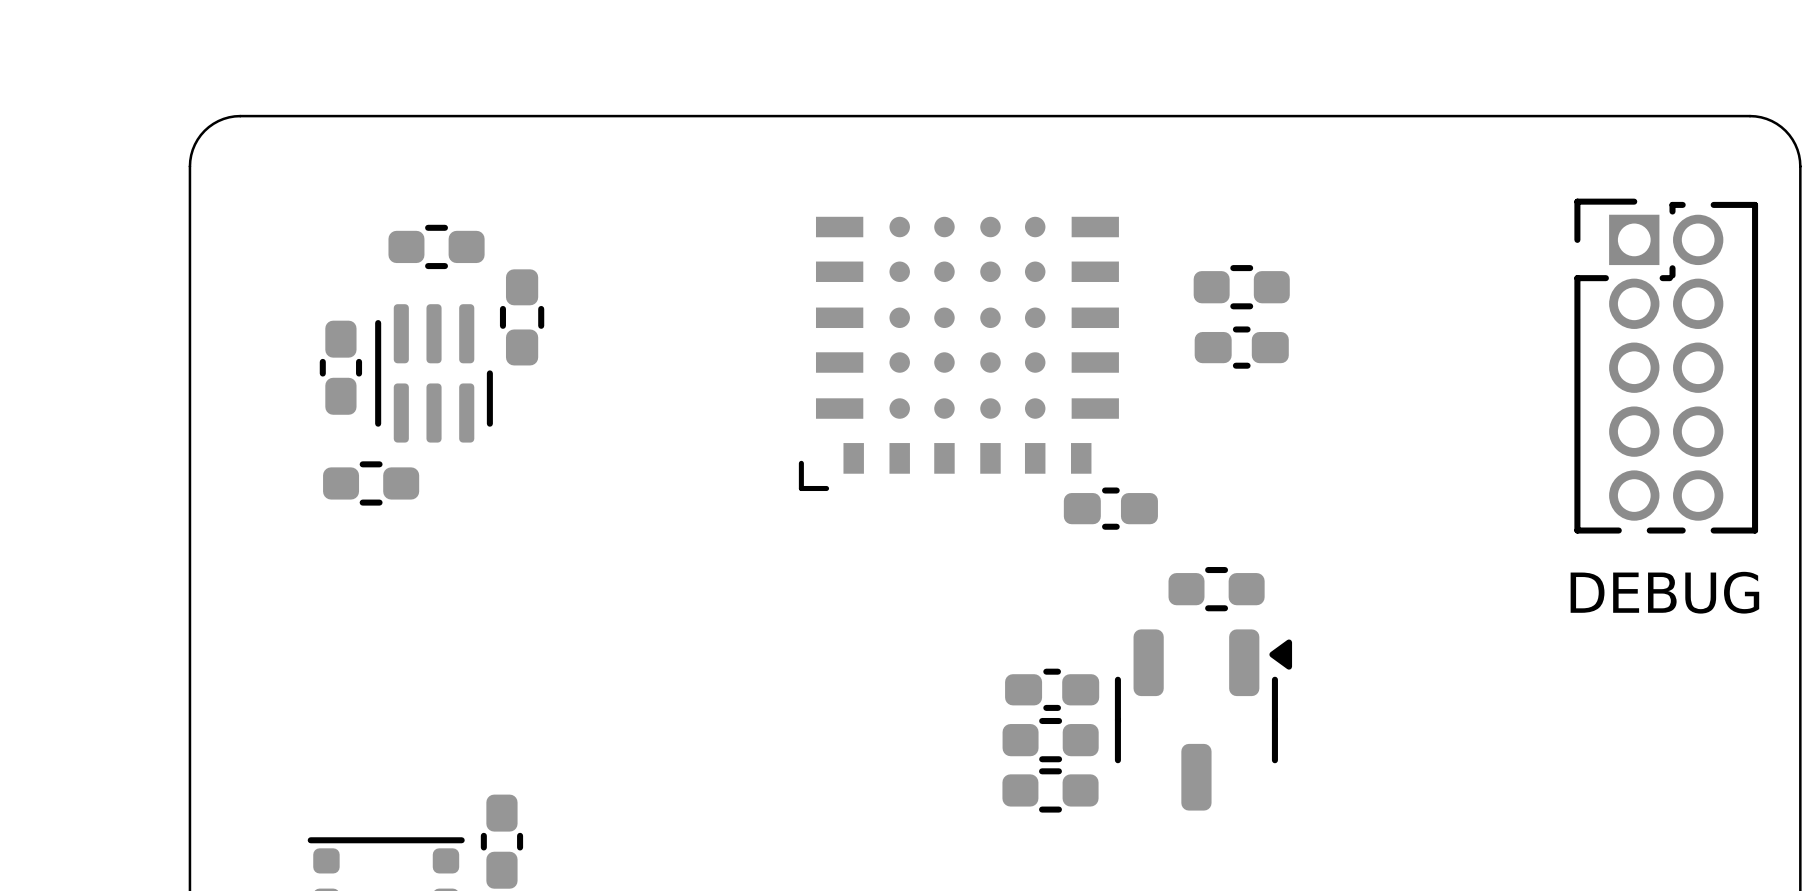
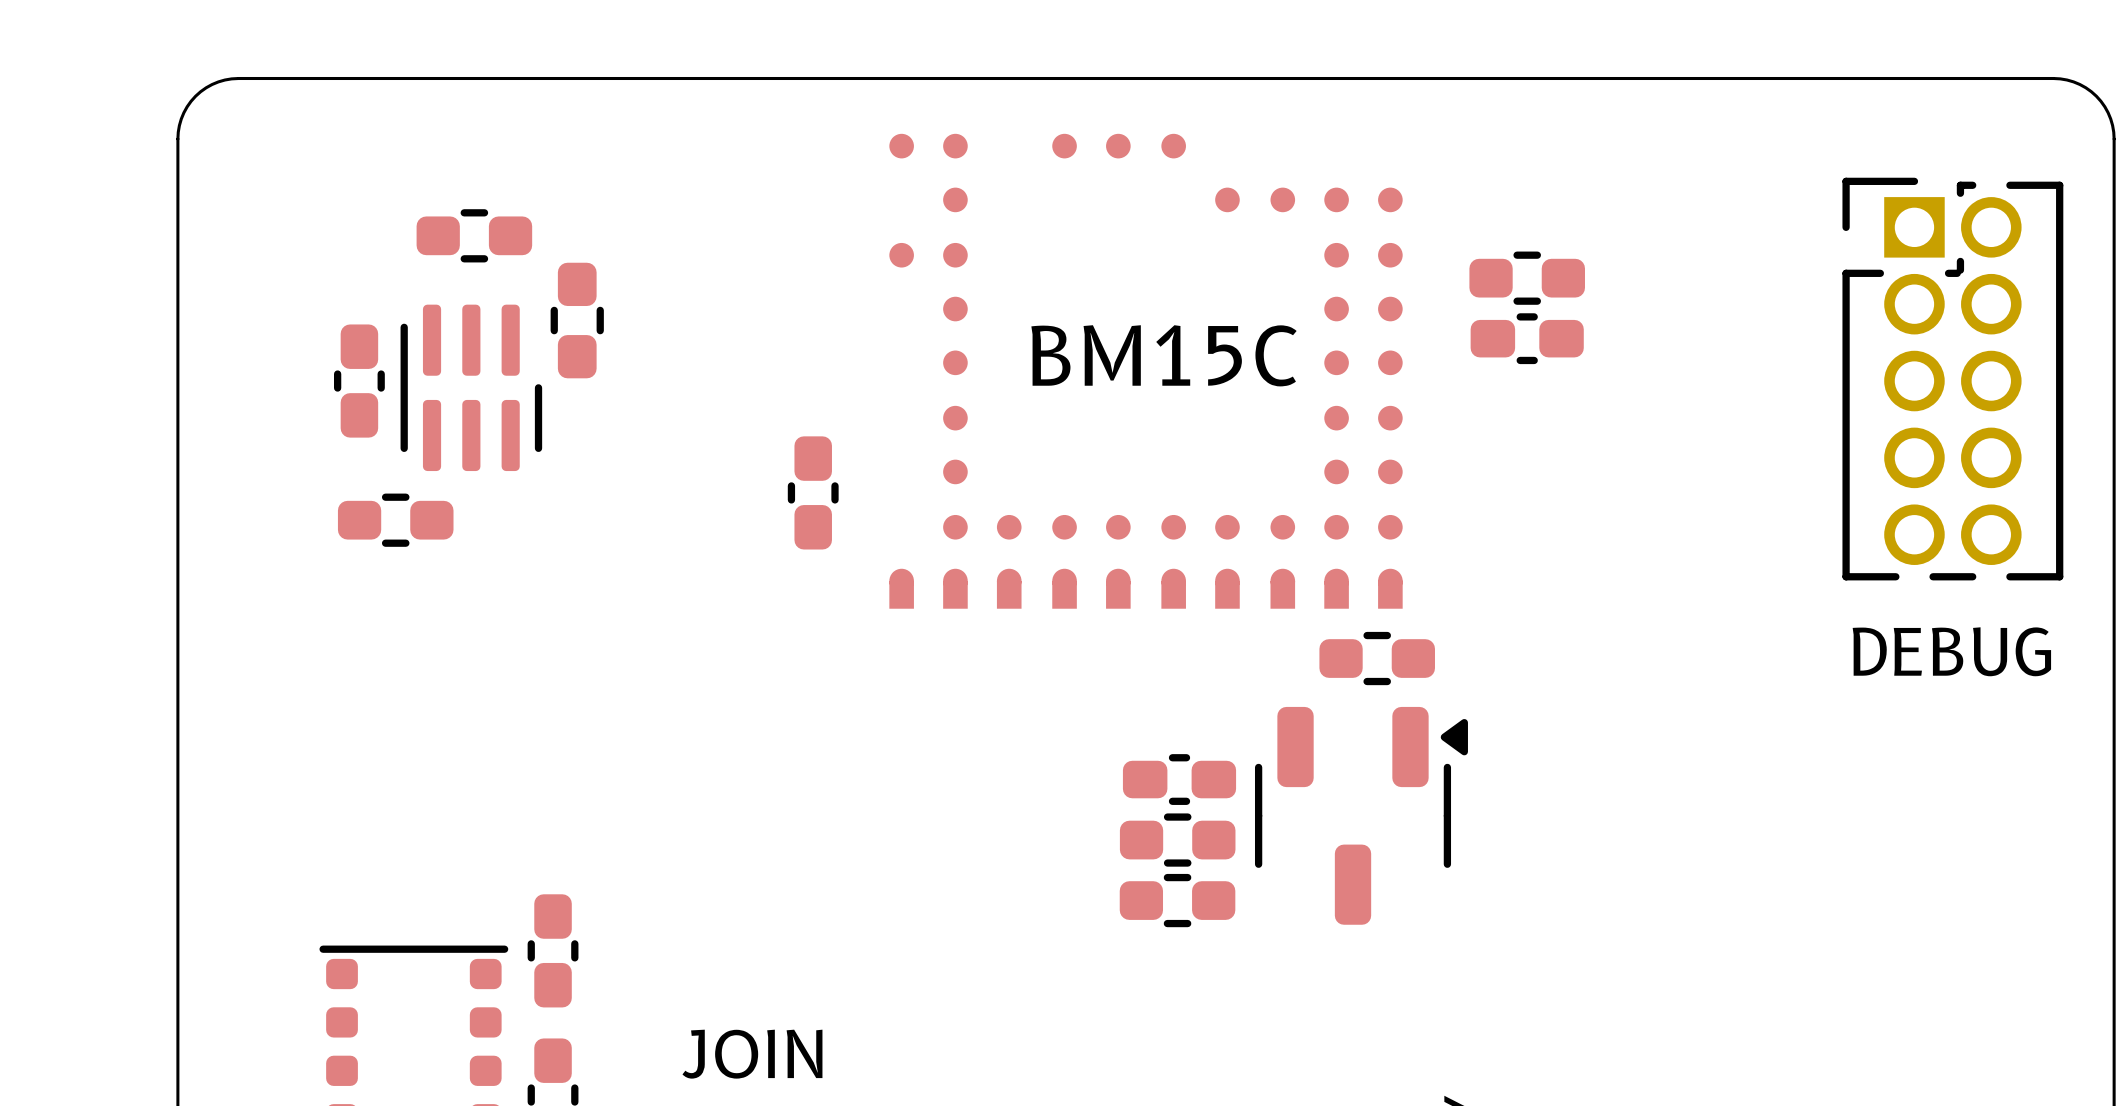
part footprint: [798, 216, 1119, 492] -> [889, 133, 1403, 609]
part position: (1241, 287) -> (1527, 278)
part position: (1241, 347) -> (1527, 338)
part: none -> (813, 492)
part: (1110, 508) -> none
part position: (1216, 589) -> (1377, 658)
part position: (1052, 689) -> (1179, 779)
part position: (1203, 719) -> (1361, 815)
part: (1050, 740) -> none
part: none -> (1177, 840)
part: (1050, 790) -> none
part: none -> (1177, 900)

